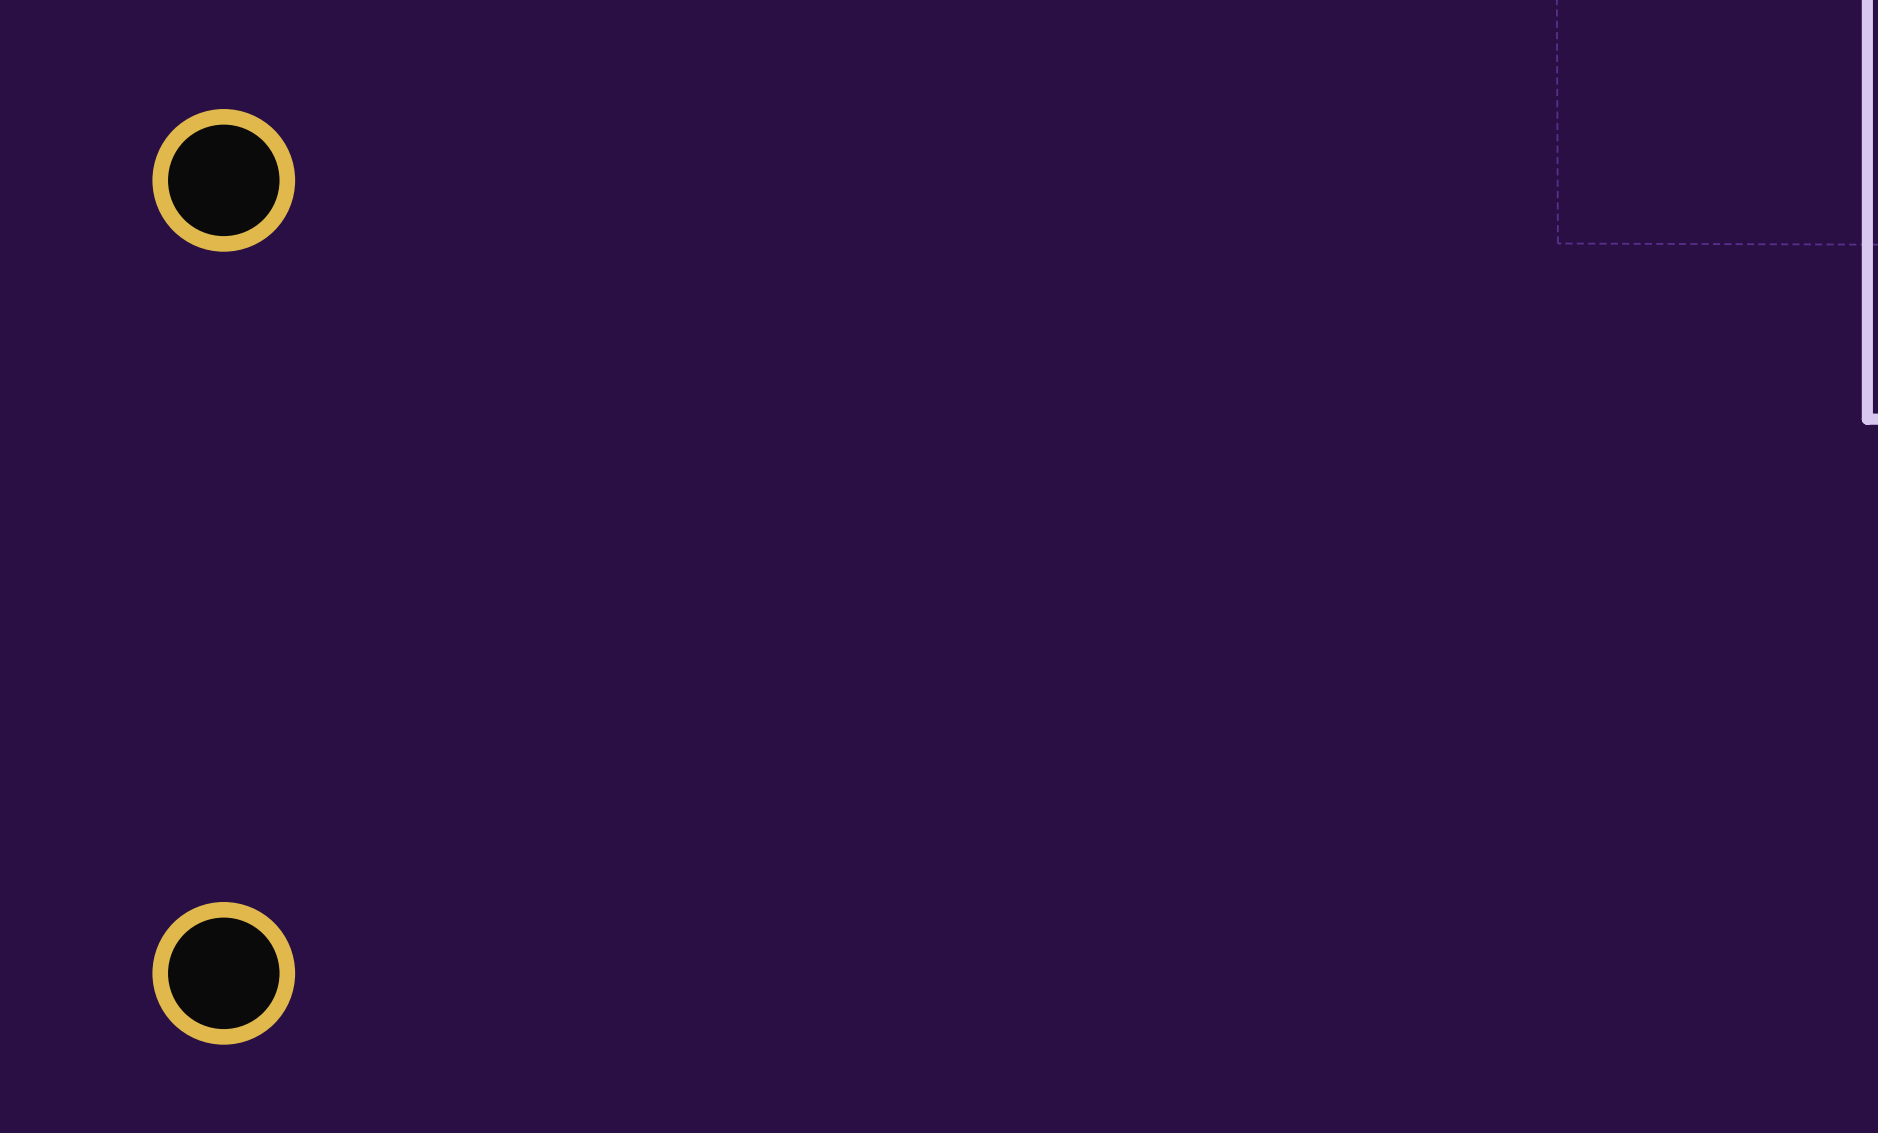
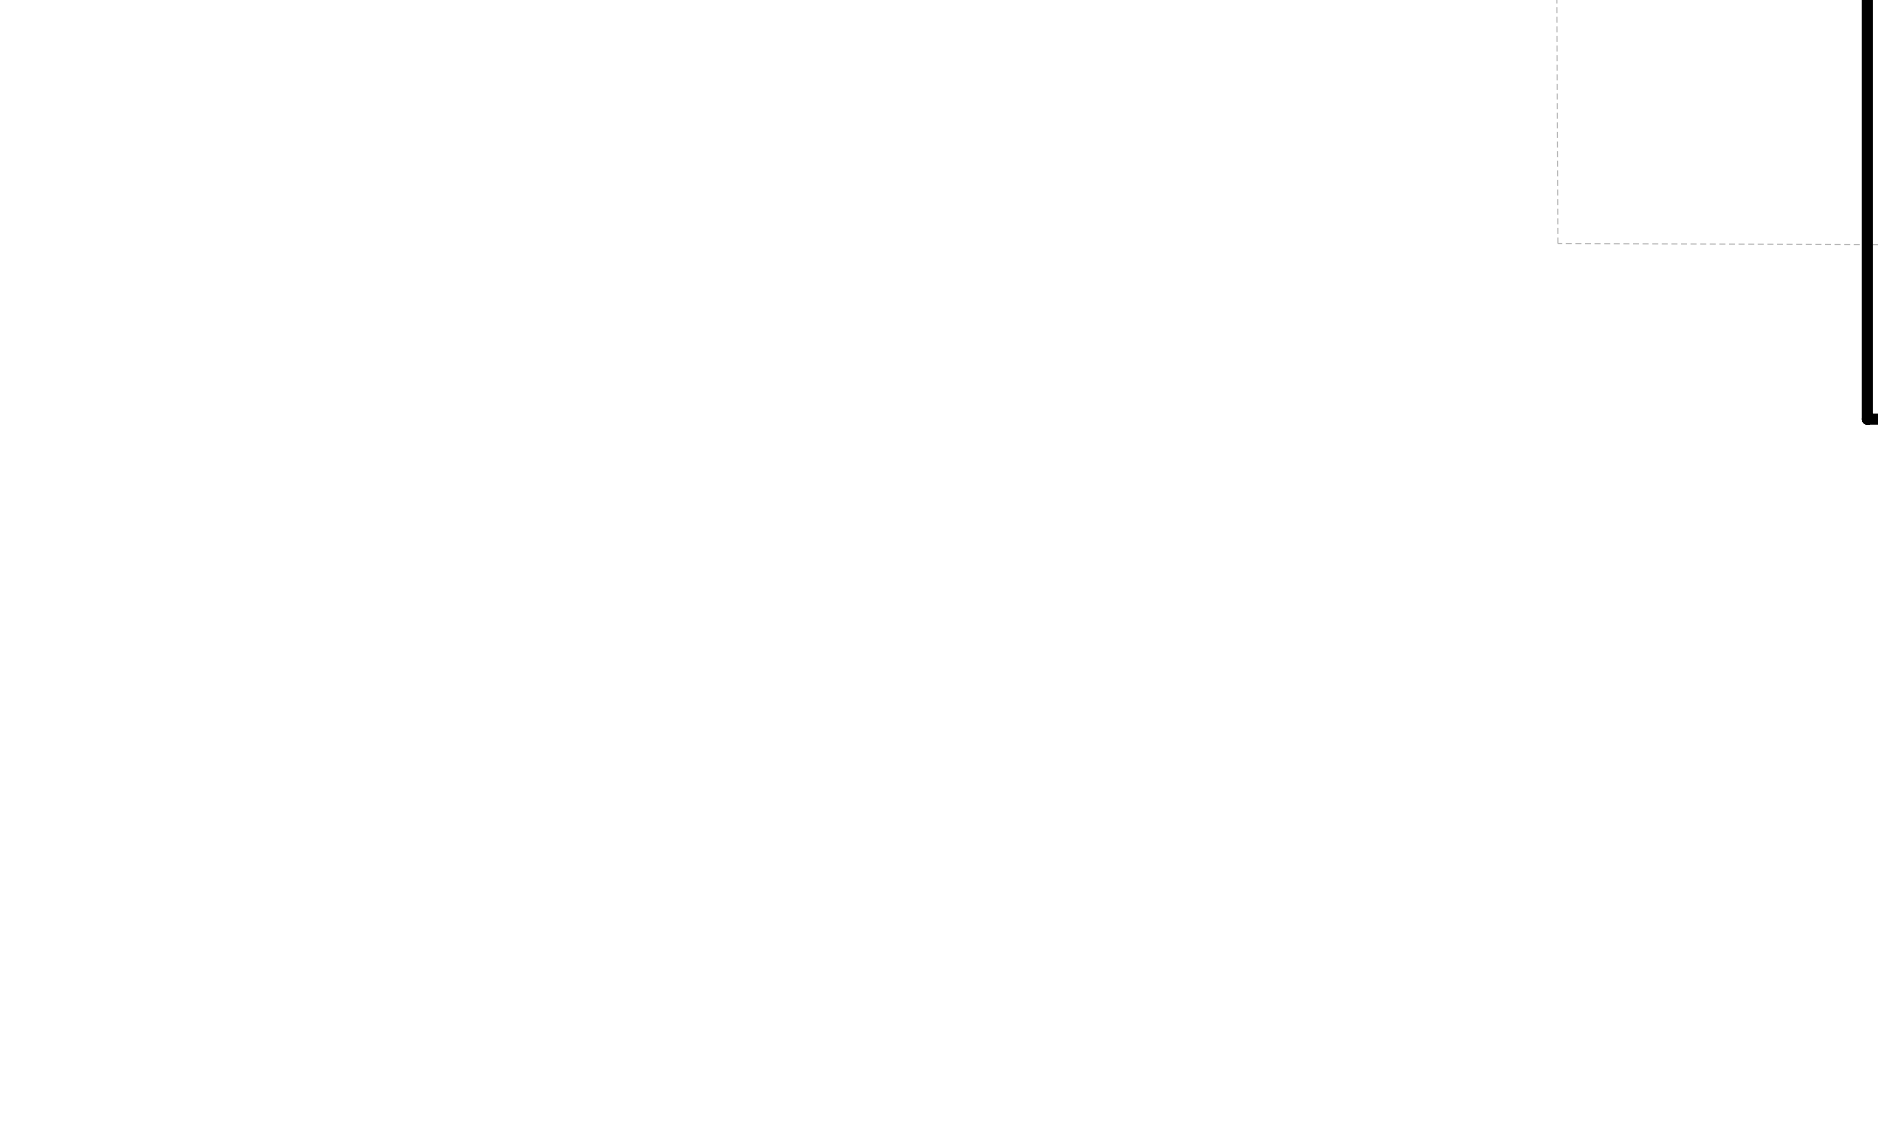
part: (223, 180) -> none
part: (223, 973) -> none

